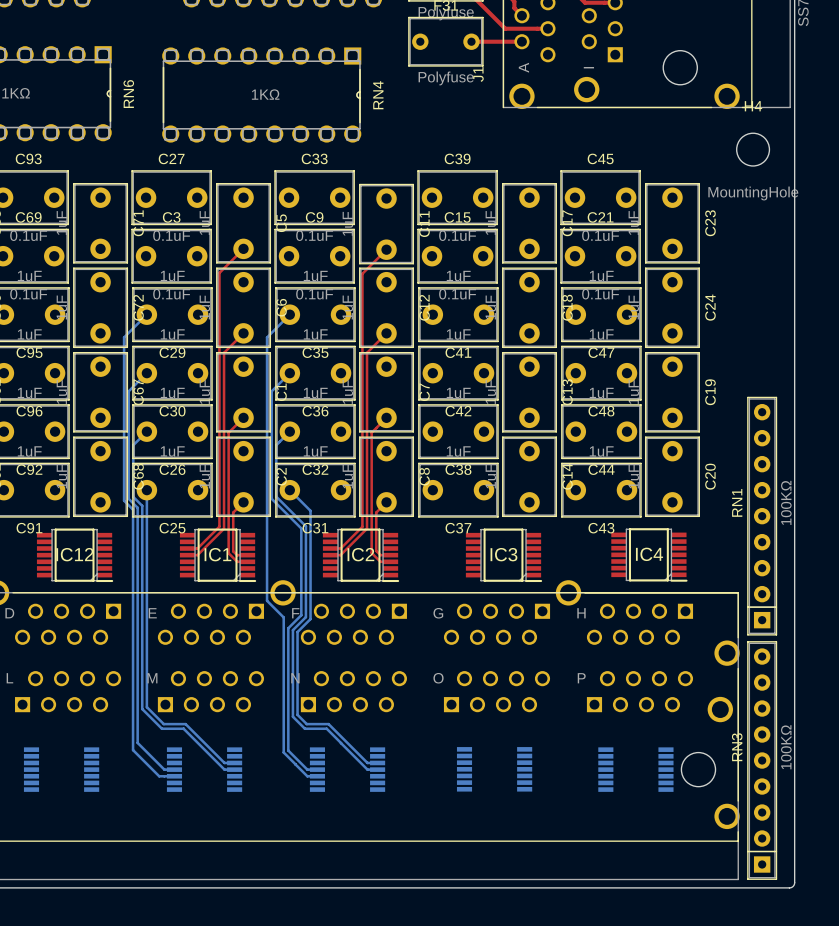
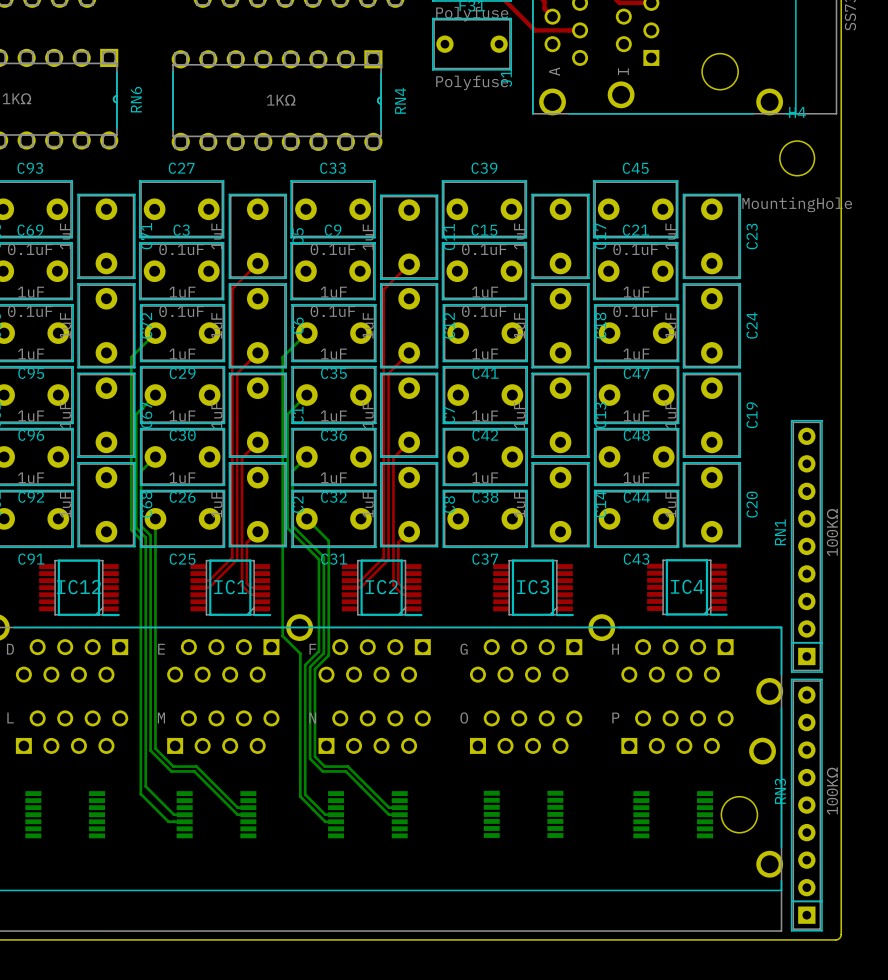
top track: (471, 41) (521, 41) -> none

